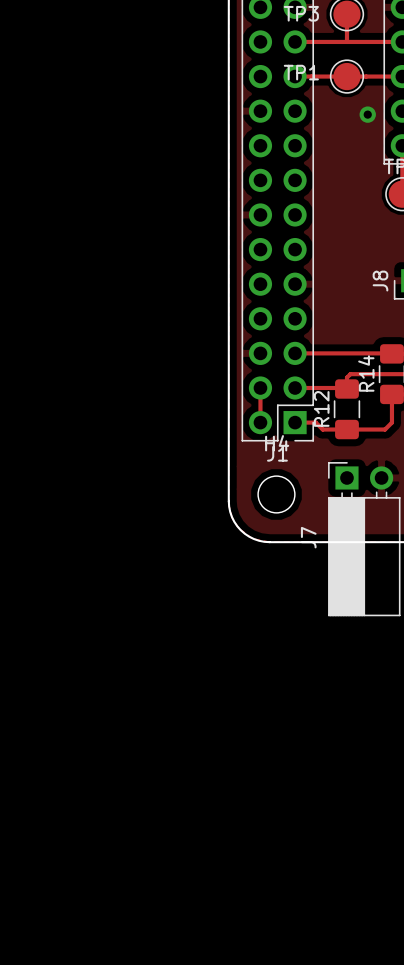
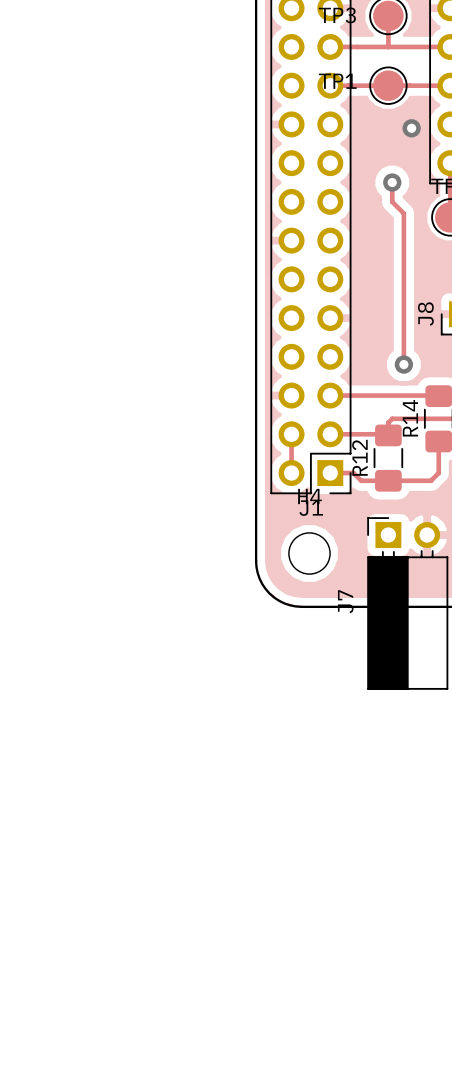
track: none -> (392, 182) (392, 201) (403, 213) (403, 364)
via: none -> (392, 182)
via: none -> (403, 364)

